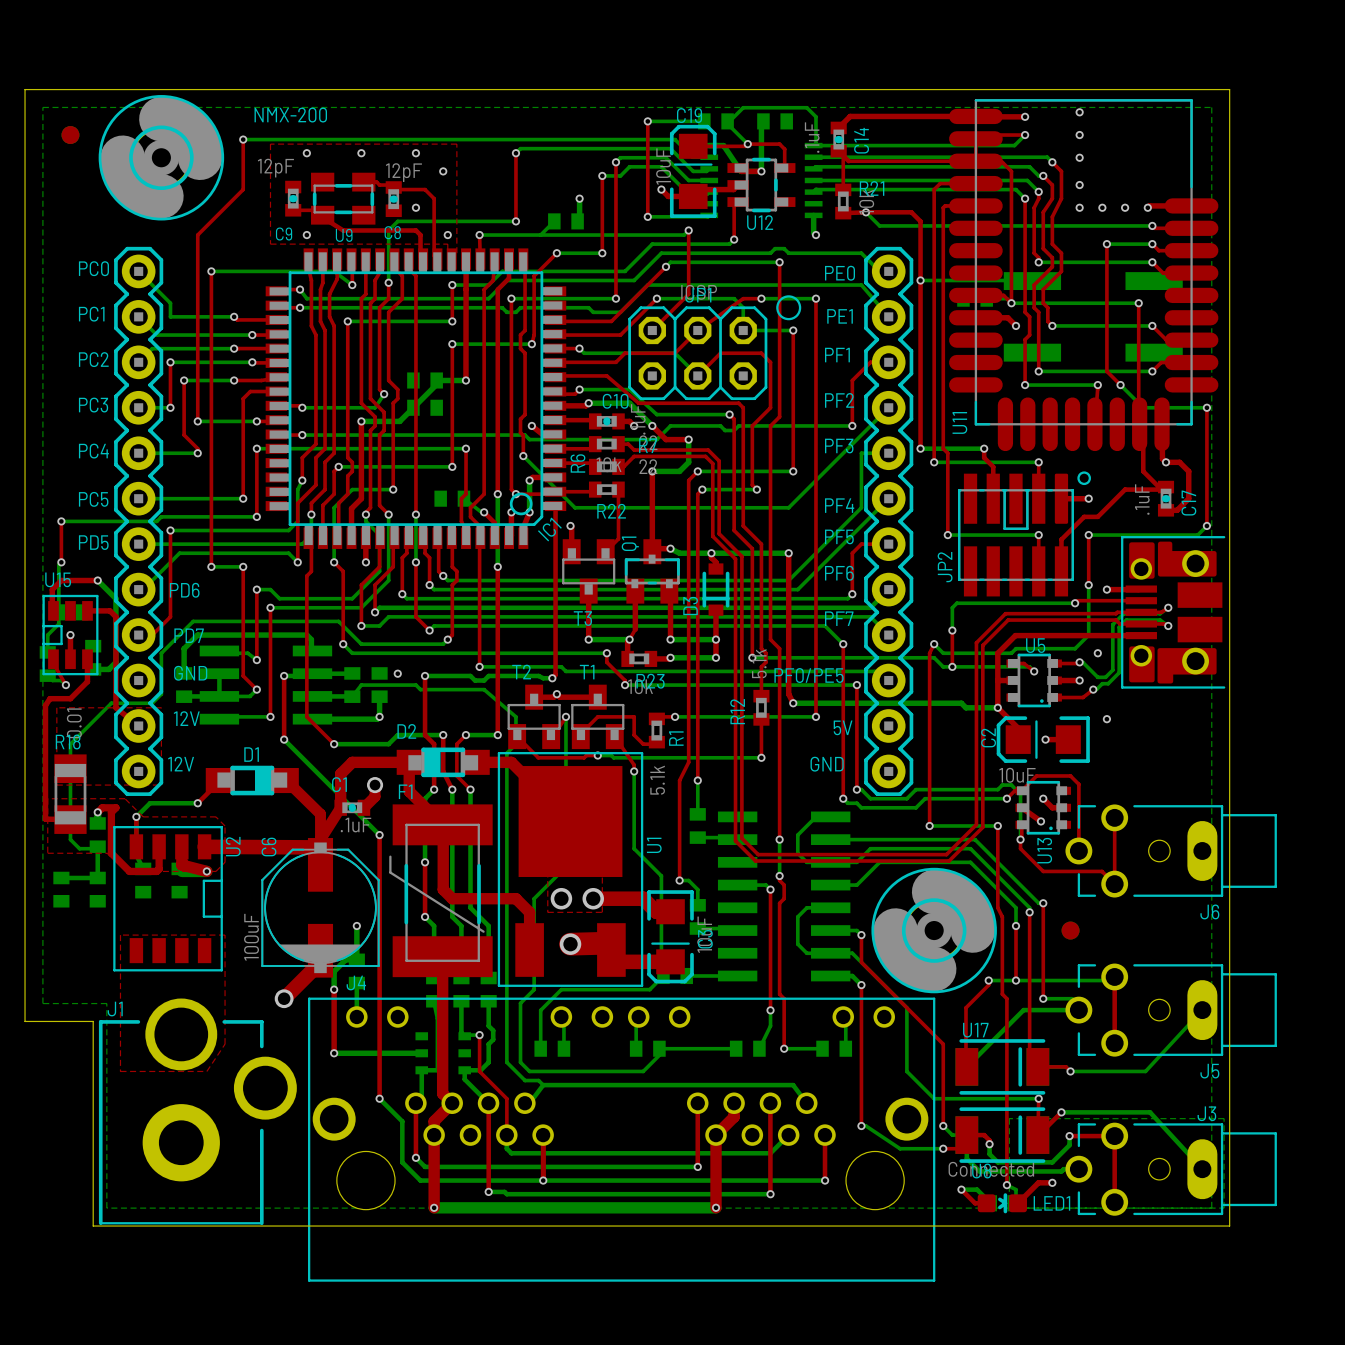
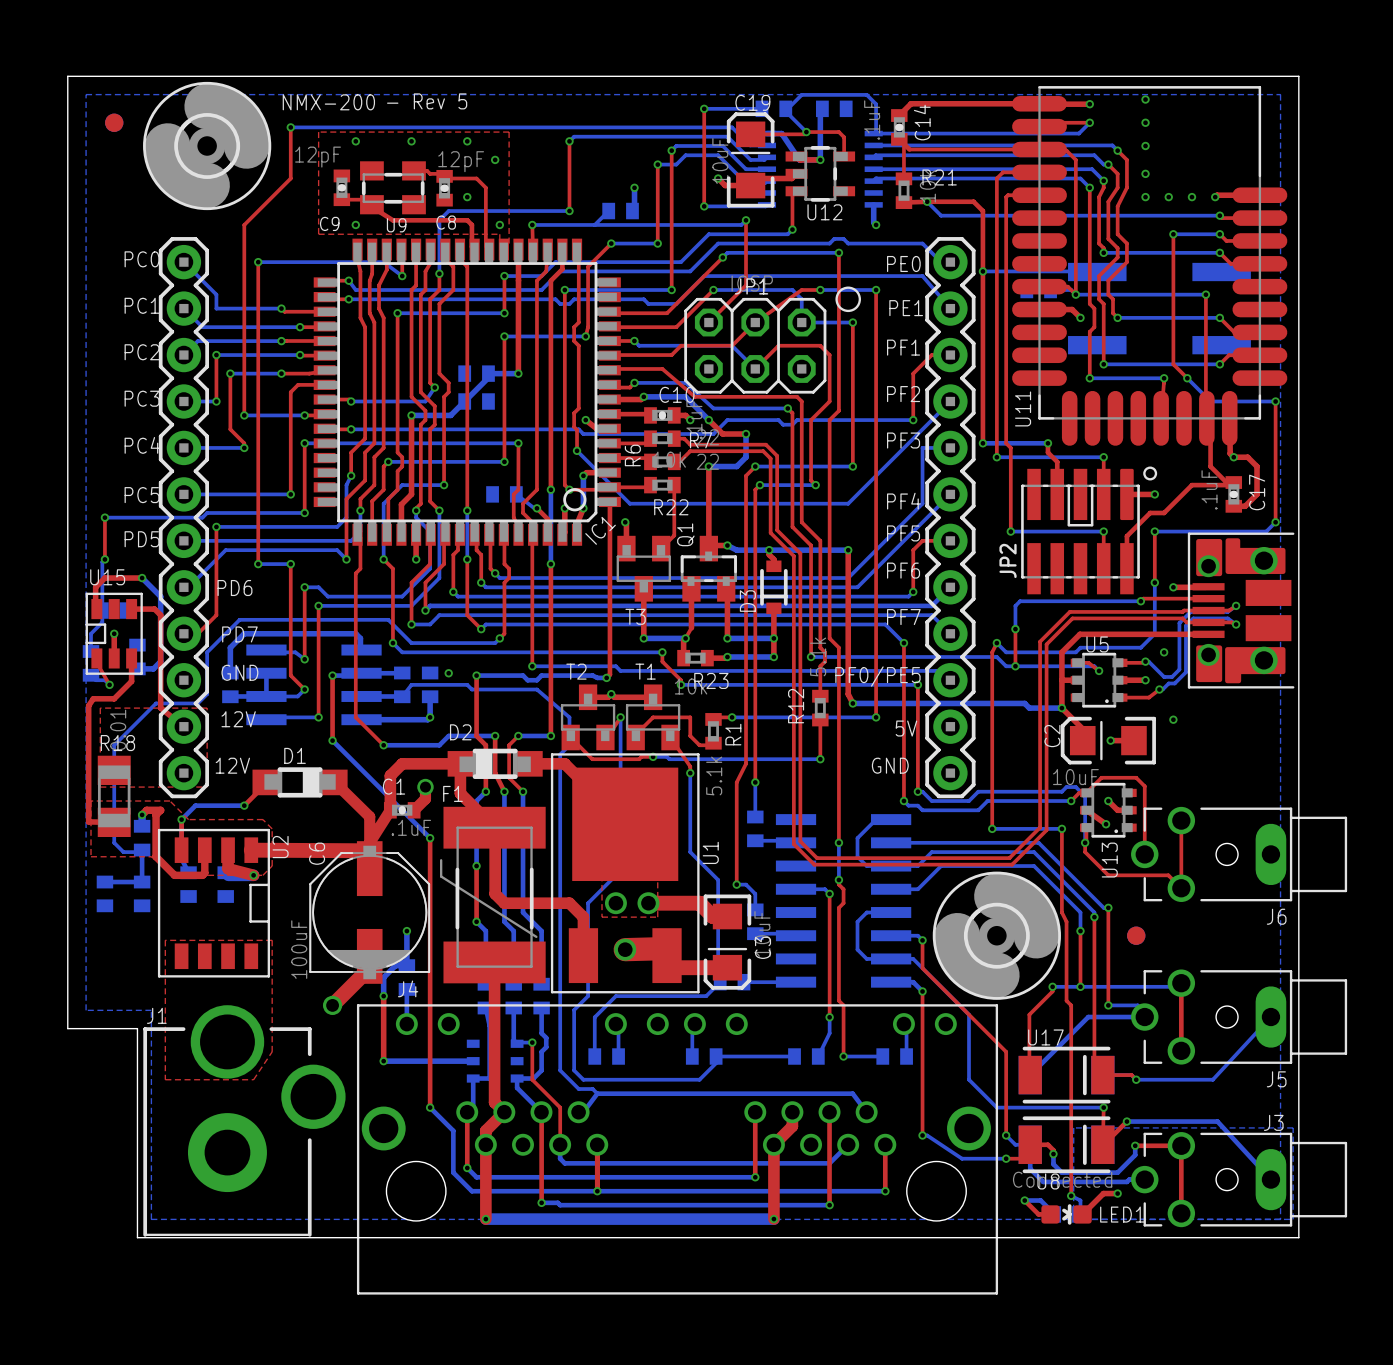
text: none -> - Rev 5 (427, 101)

